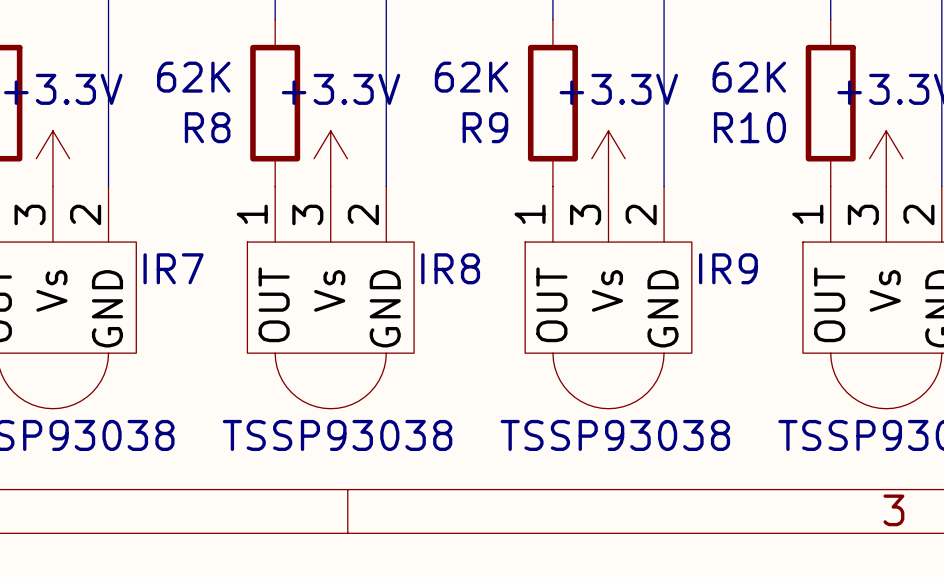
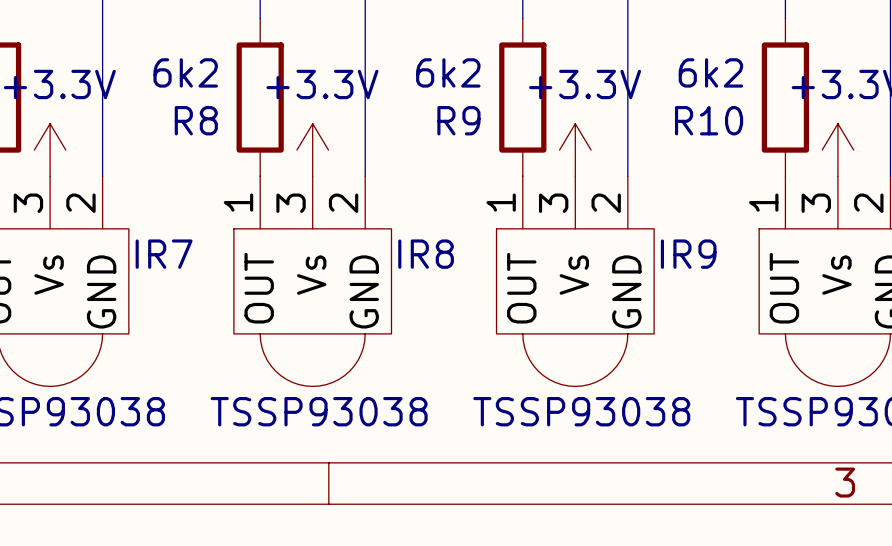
R8 value: 62K (193, 77) -> 6k2 (185, 72)
R9 value: 62K (471, 77) -> 6k2 (448, 72)
R10 value: 62K (749, 77) -> 6k2 (710, 72)

